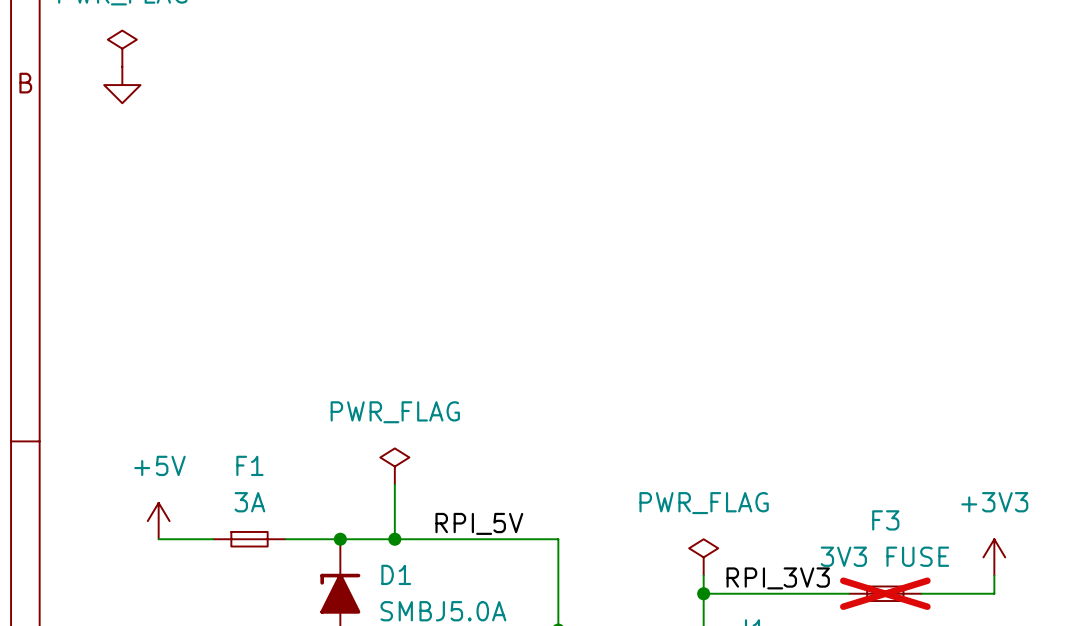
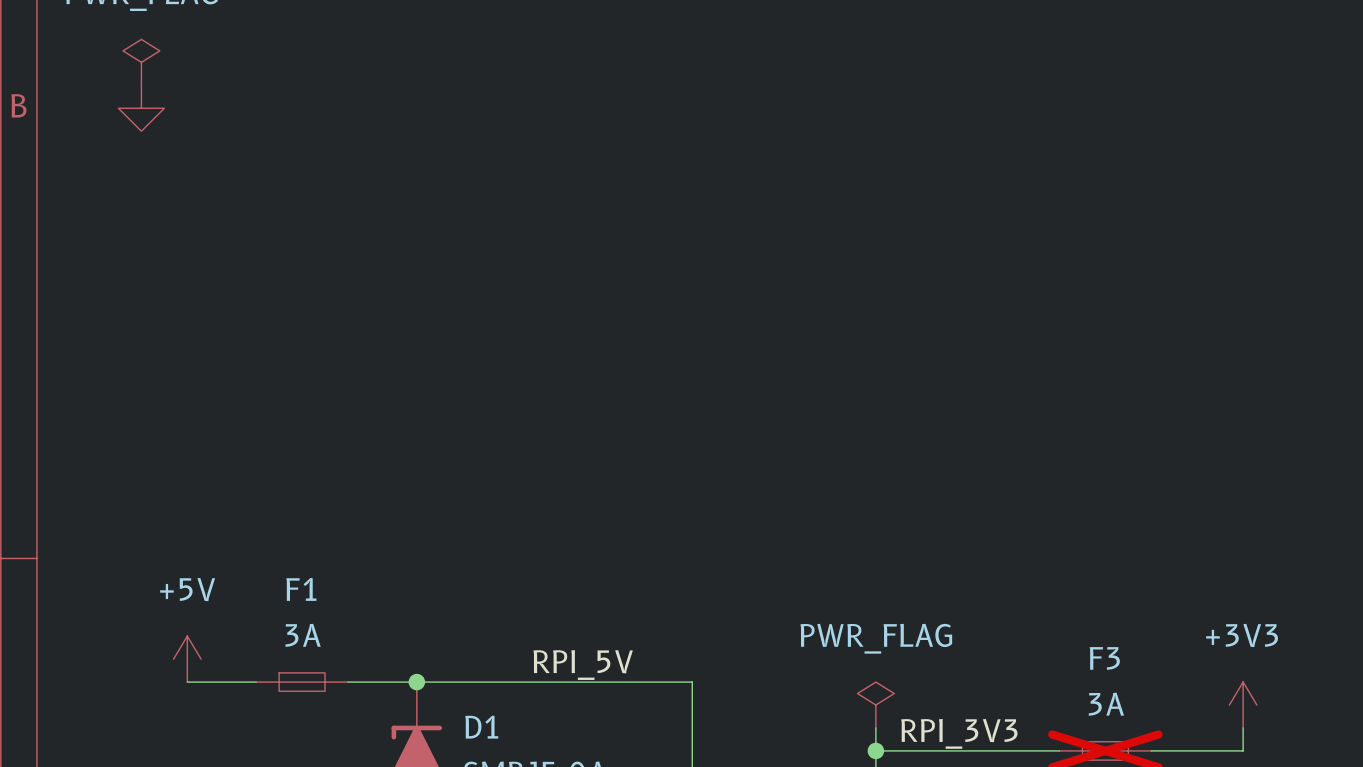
power symbol: PWR_FLAG (394, 466) -> none
wire: (394, 484) (394, 539) -> none
junction: (394, 539) -> none
F3 value: 3V3 FUSE (884, 556) -> 3A (1106, 704)

